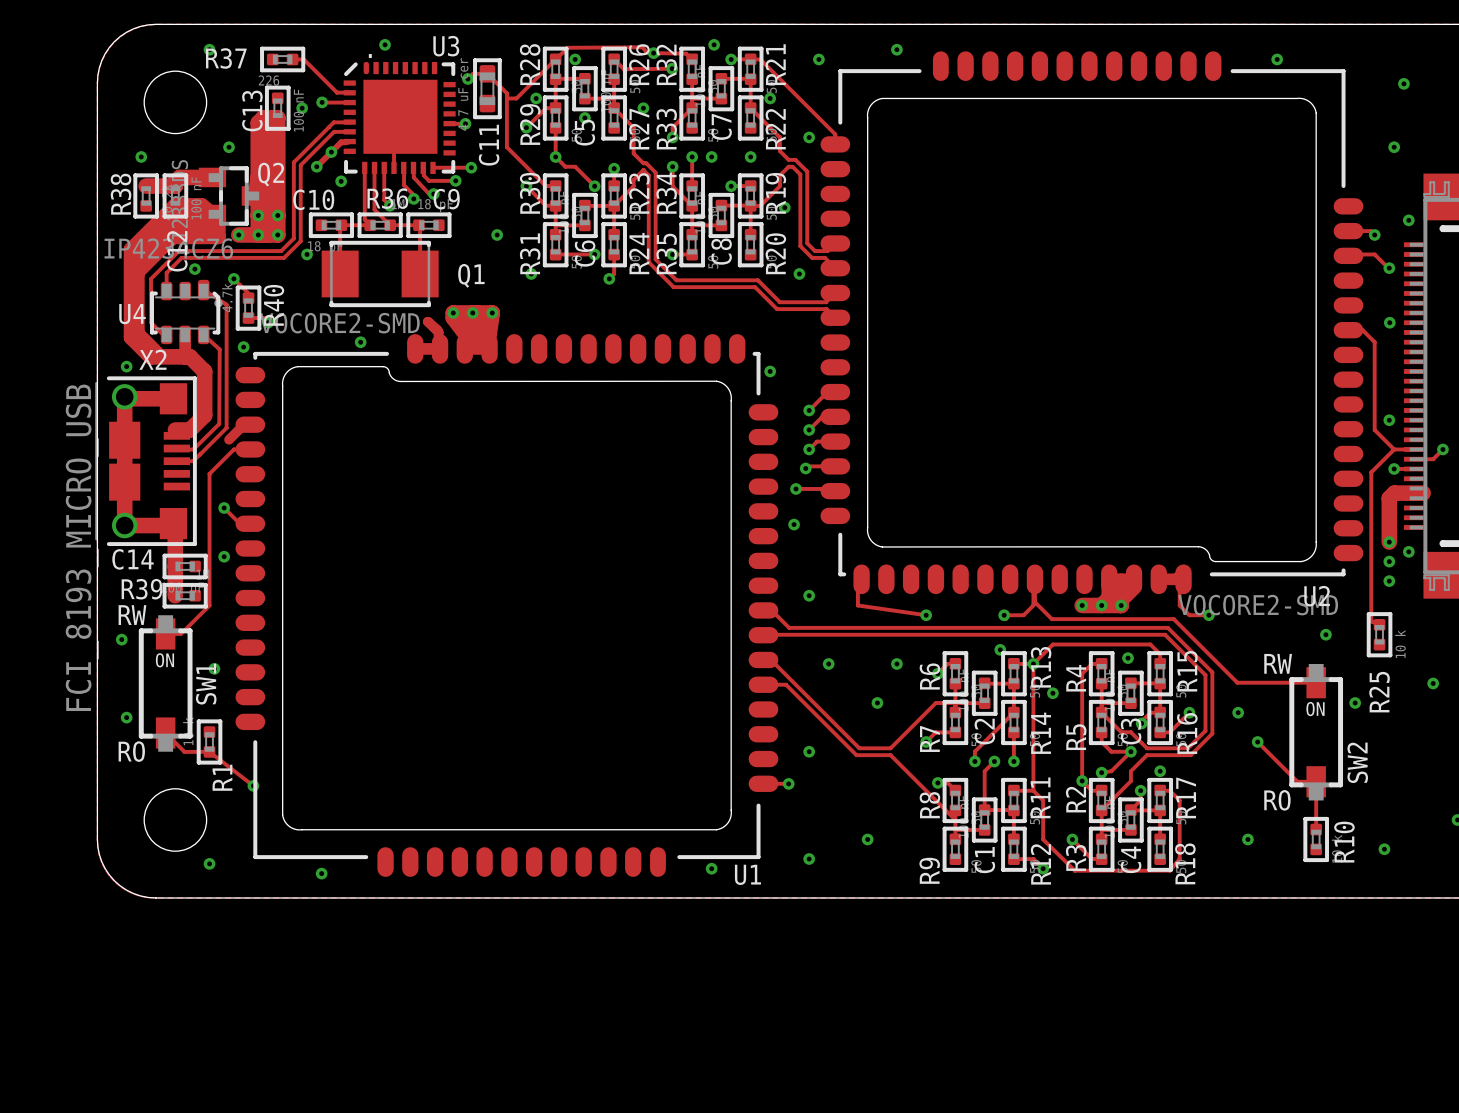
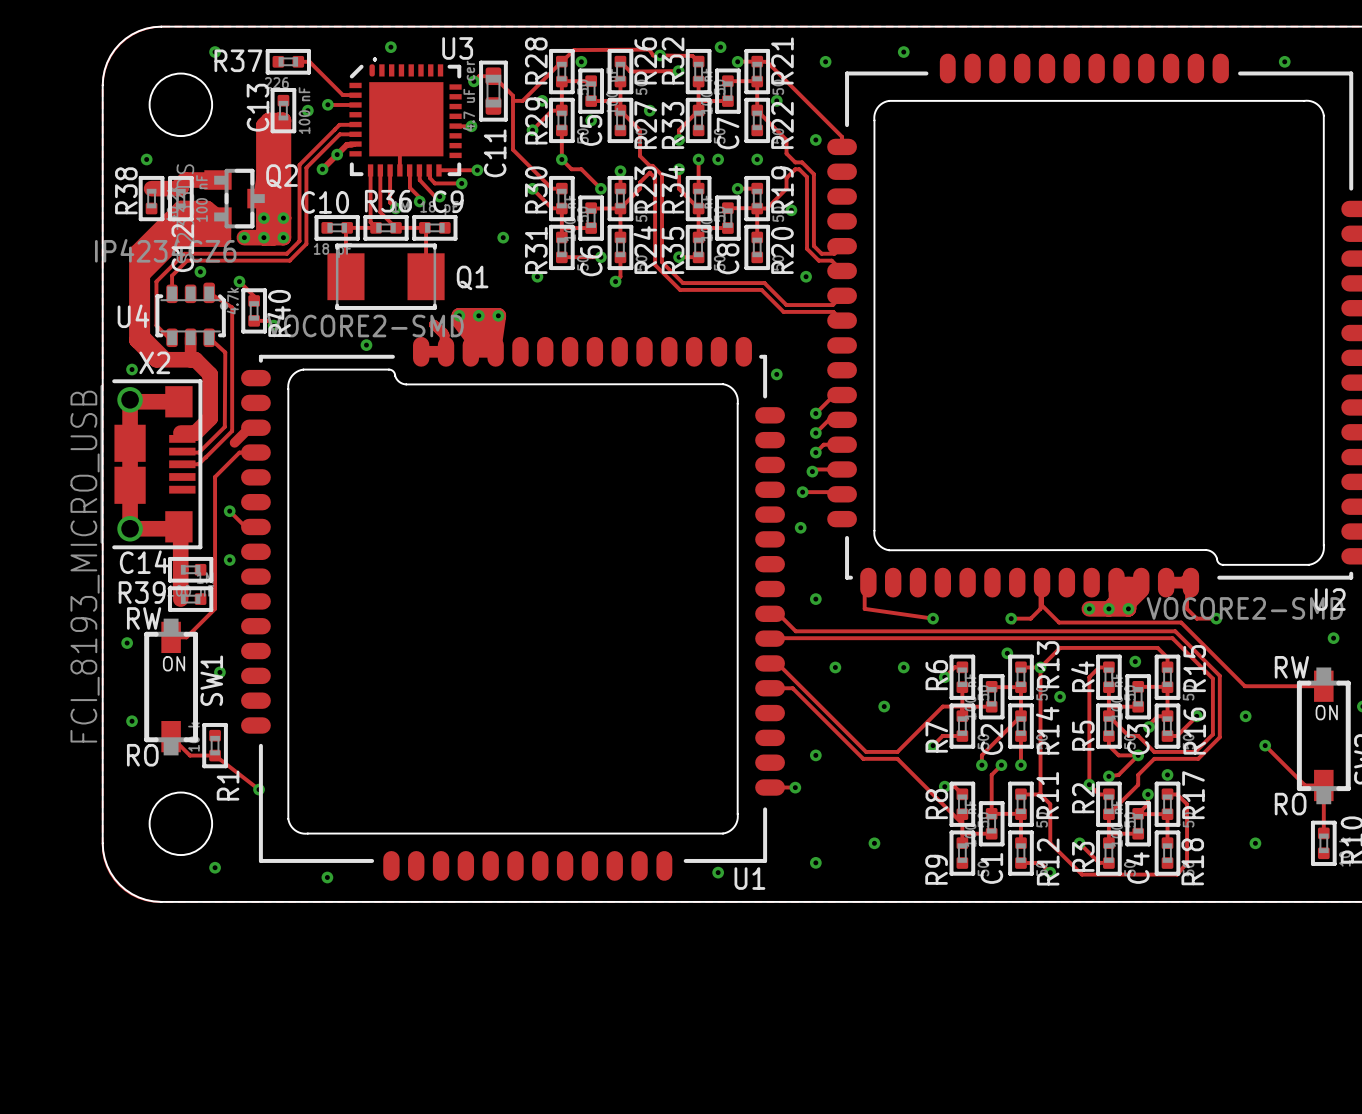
via: (229, 147) -> none
via: (341, 181) -> none
via: (307, 254) -> none
via: (243, 347) -> none

